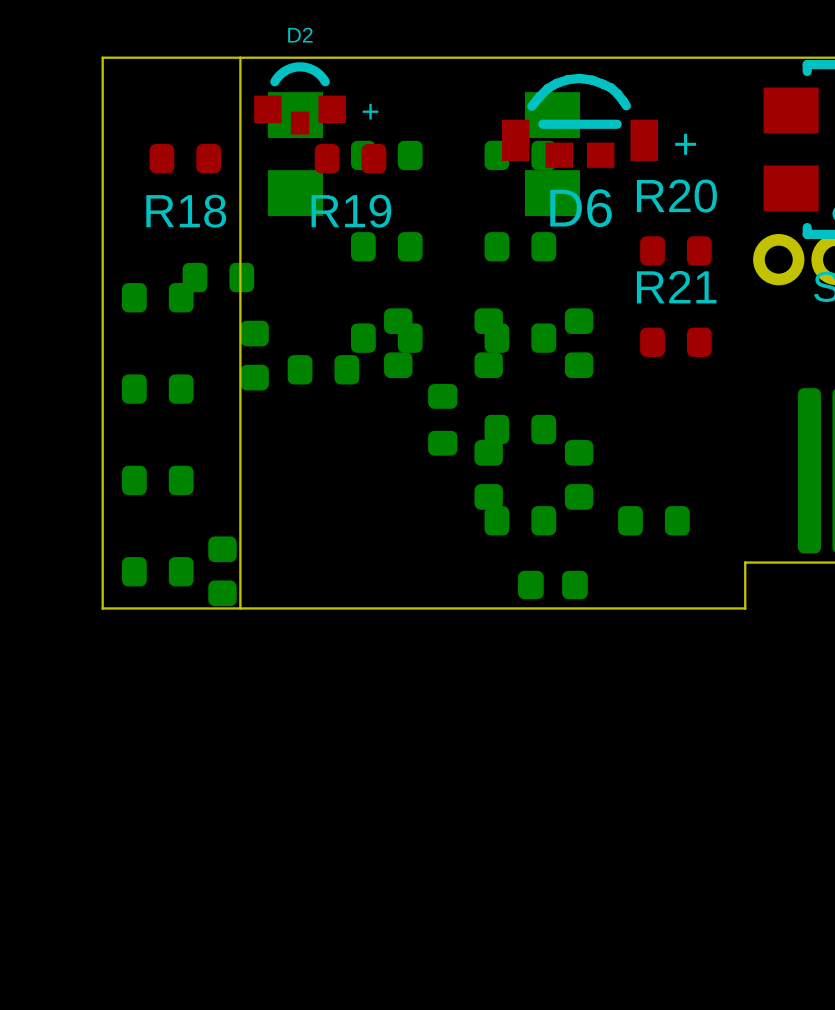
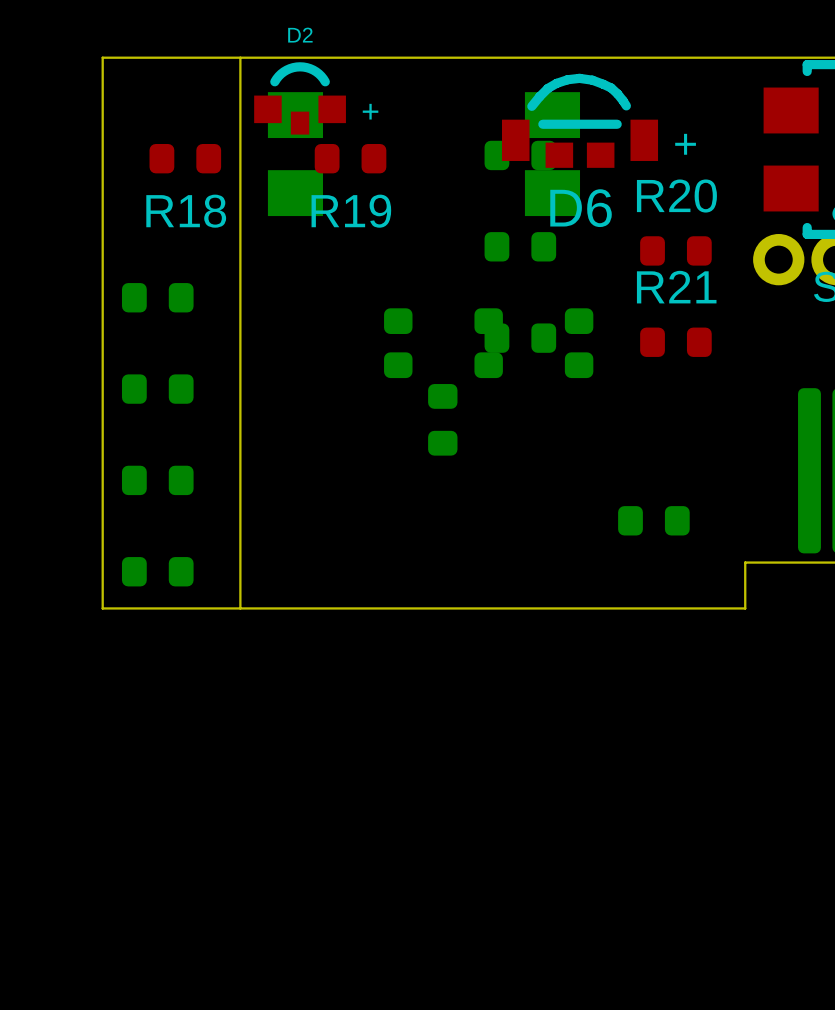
part: (386, 155) -> none
part: (386, 246) -> none
part: (218, 277) -> none
part: (386, 338) -> none
part: (254, 355) -> none
part: (323, 369) -> none
part: (520, 429) -> none
part: (488, 474) -> none
part: (579, 474) -> none
part: (520, 520) -> none
part: (222, 571) -> none
part: (552, 585) -> none

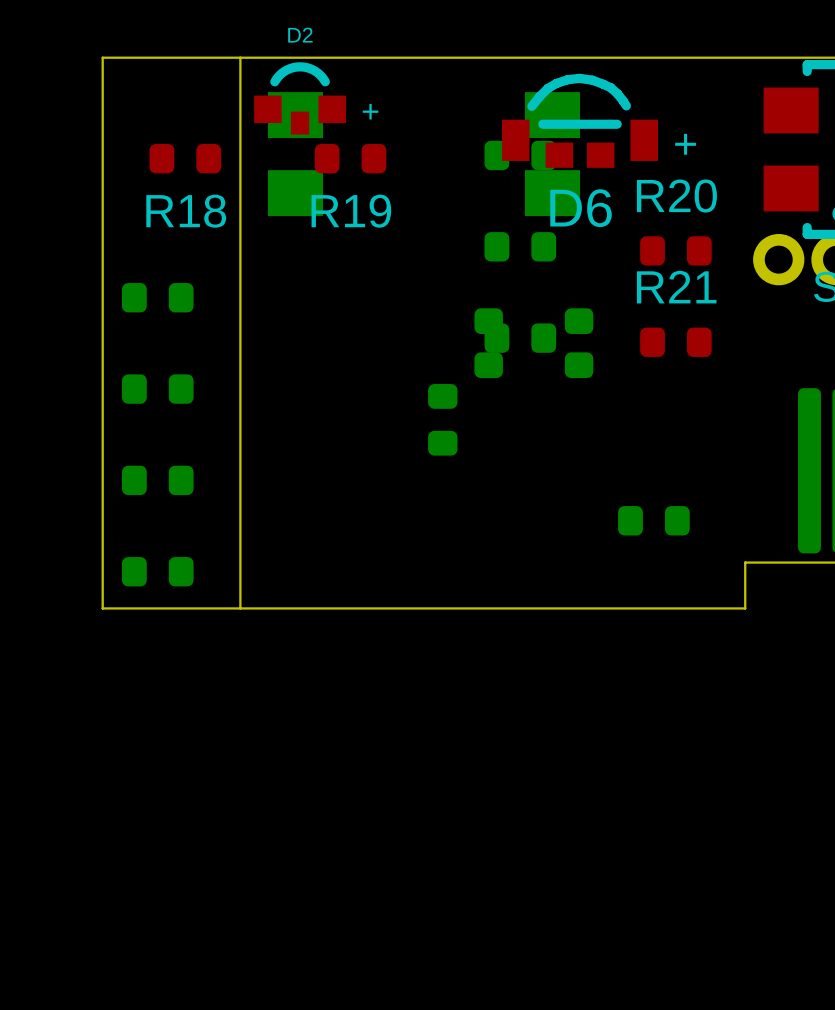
part: (398, 343) -> none

